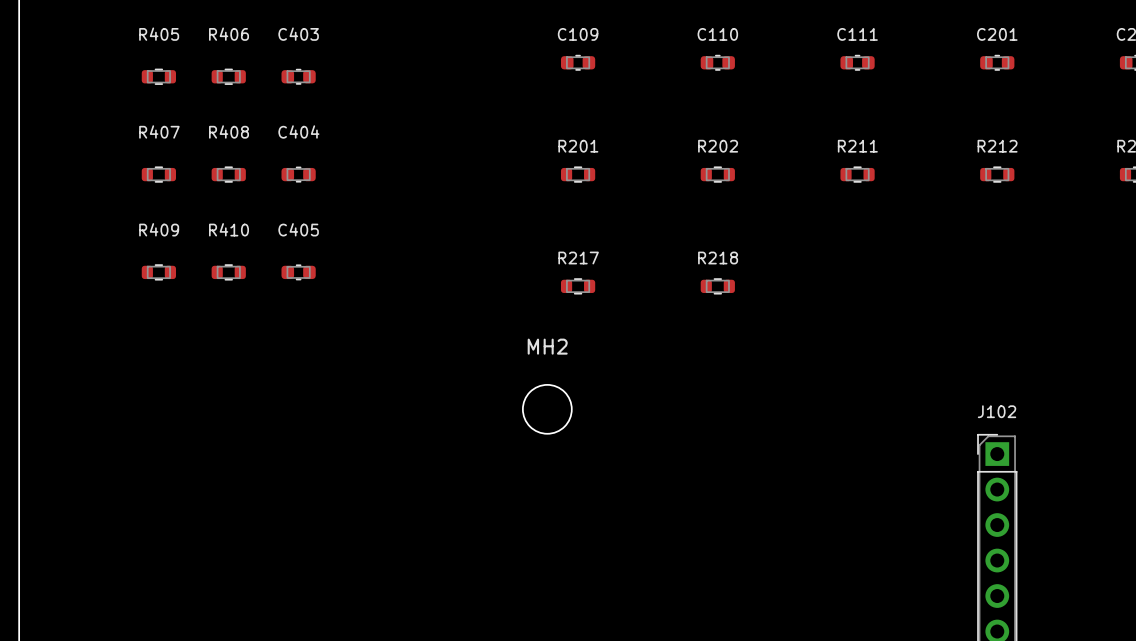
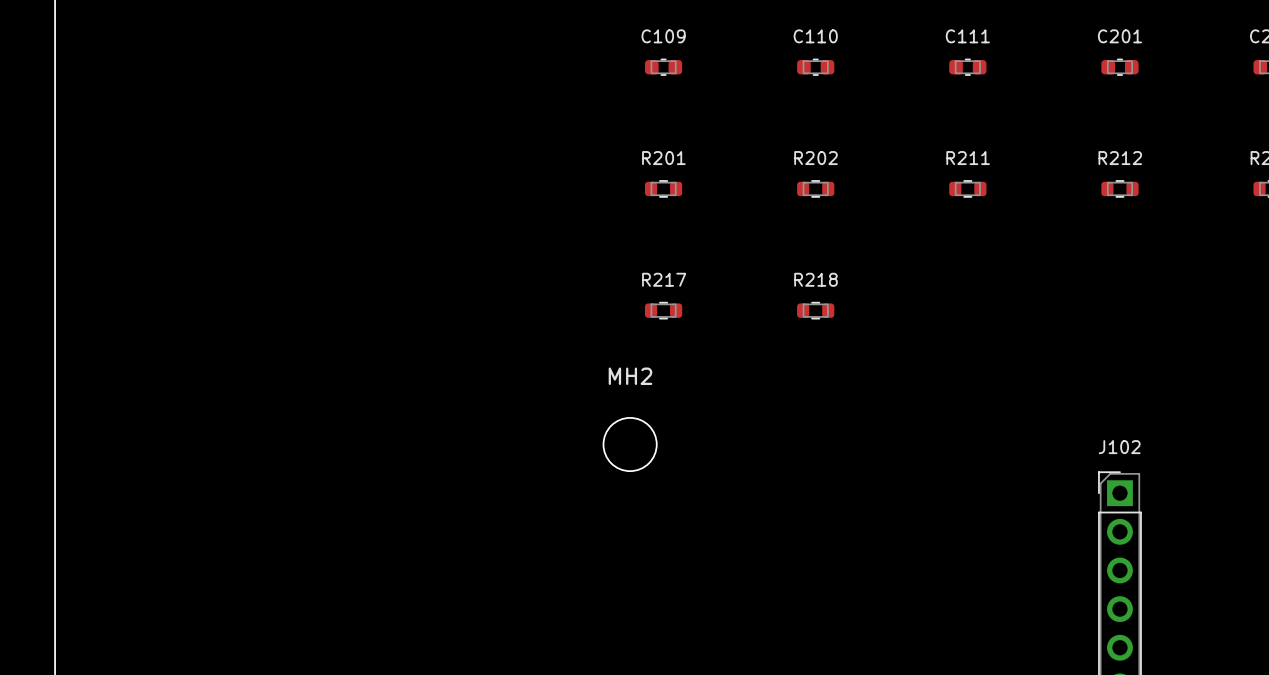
R405: (158, 76) -> none
R406: (228, 76) -> none
C403: (298, 76) -> none
R407: (158, 174) -> none
R408: (228, 174) -> none
C404: (298, 174) -> none
R409: (158, 272) -> none
R410: (228, 272) -> none
C405: (298, 272) -> none

